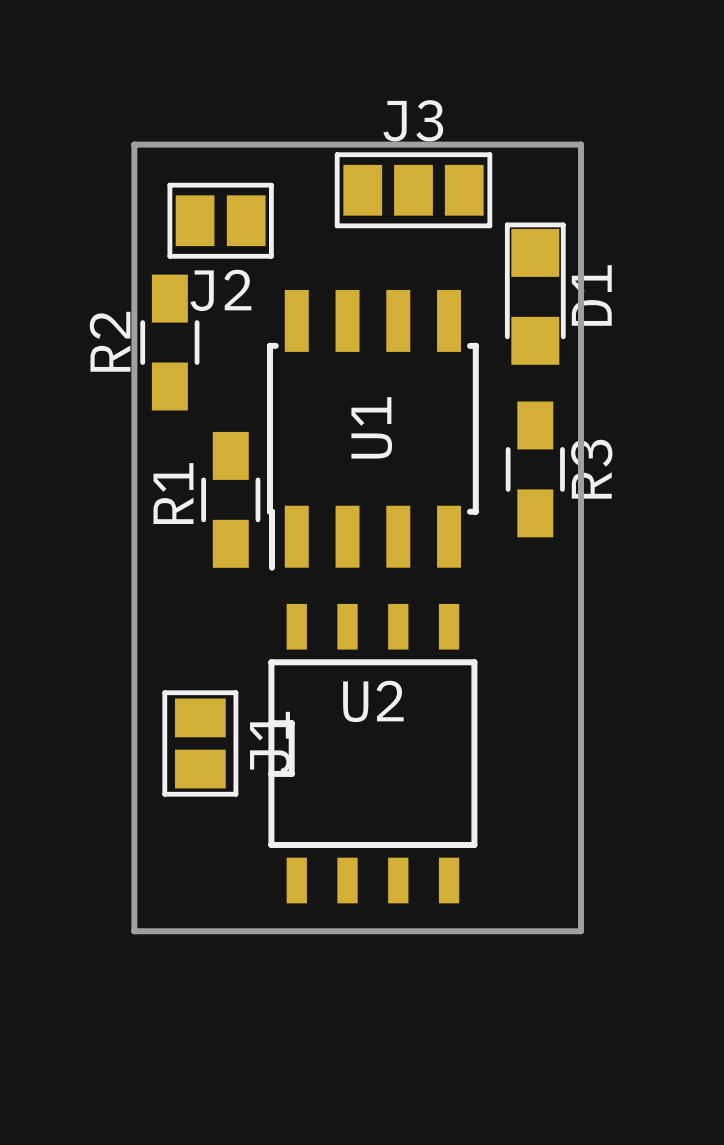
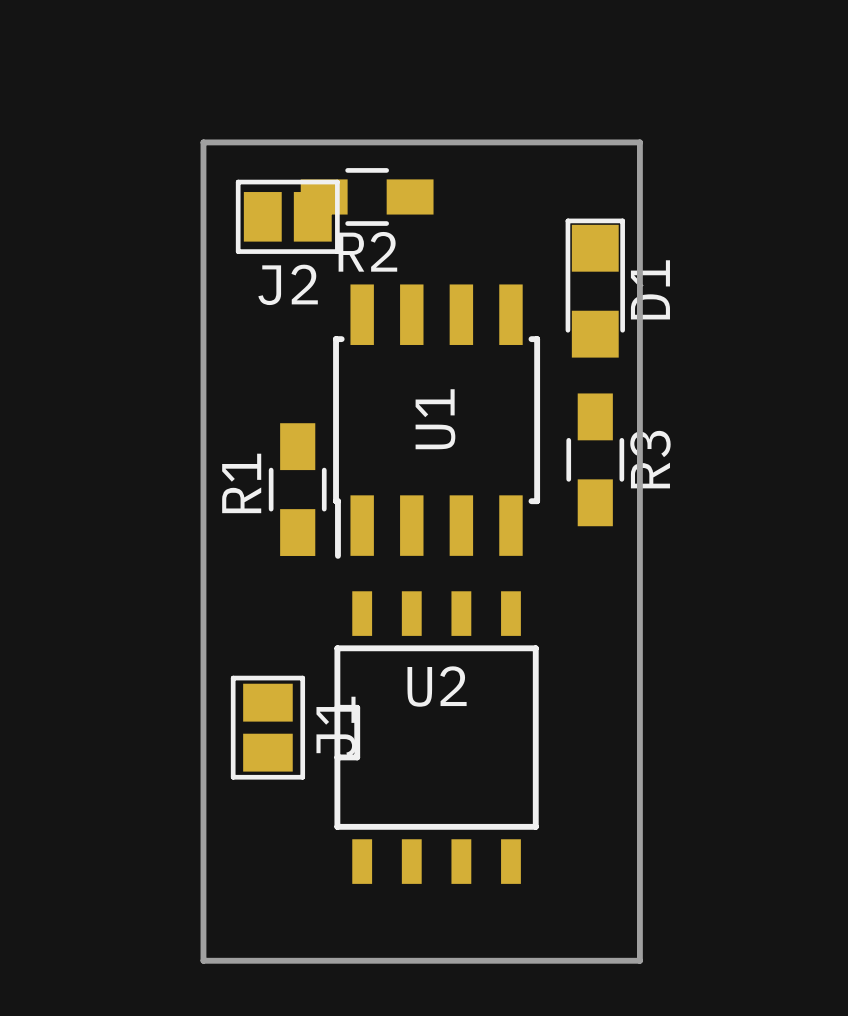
J3: (413, 190) -> none
R2 name position: R2 (110, 341) -> R2 (367, 251)
R2 rotation: 0° (169, 342) -> 90° clockwise (367, 196)
R2 position: (169, 342) -> (367, 196)
board edge: (134, 931) (580, 931) -> (203, 911) (203, 960) (639, 960) (639, 911)

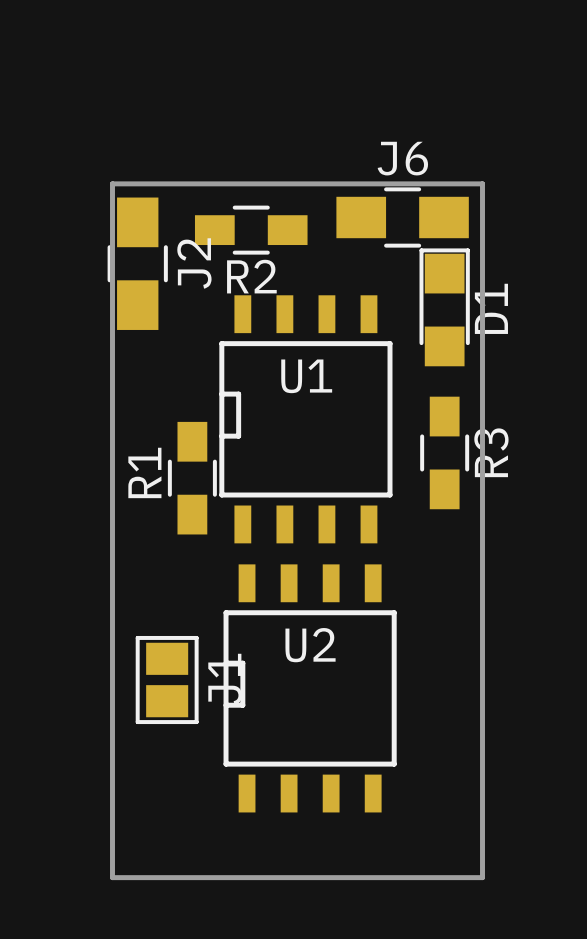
J2 footprint: [235, 179, 340, 254] -> [107, 197, 168, 330]
J6: none -> (402, 217)
J2 name position: J2 (288, 284) -> J2 (194, 263)
U1 footprint: [333, 284, 541, 559] -> [219, 295, 393, 544]

